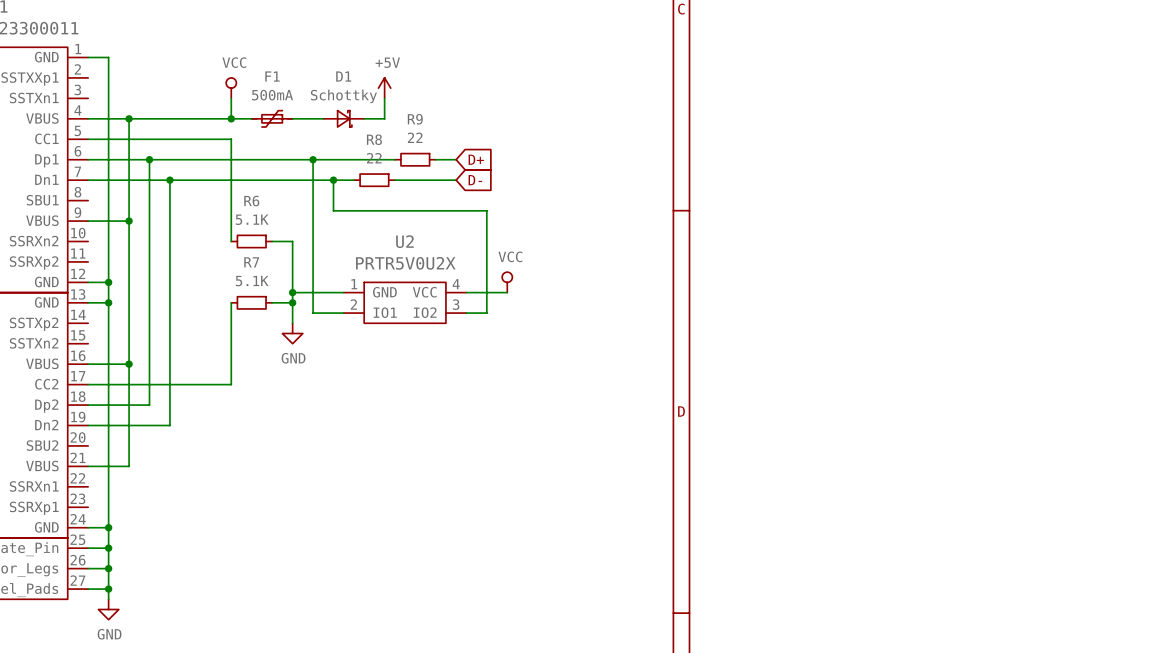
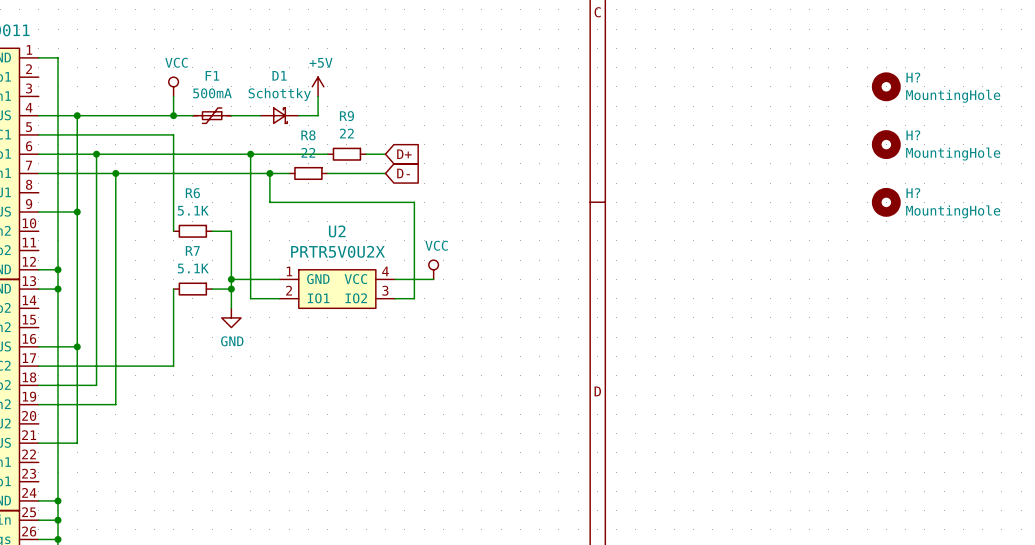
H?: none -> MountingHole (886, 86)
H?: none -> MountingHole (886, 144)
H?: none -> MountingHole (886, 202)

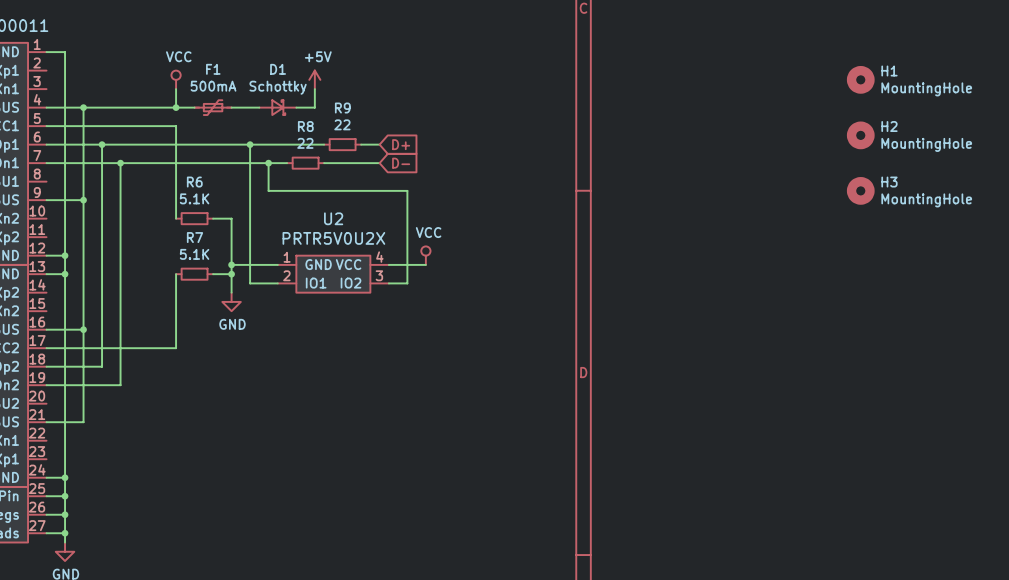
H? name: H? (913, 77) -> H1 (889, 71)
H? name: H? (913, 135) -> H2 (889, 126)
H? name: H? (913, 193) -> H3 (889, 182)

